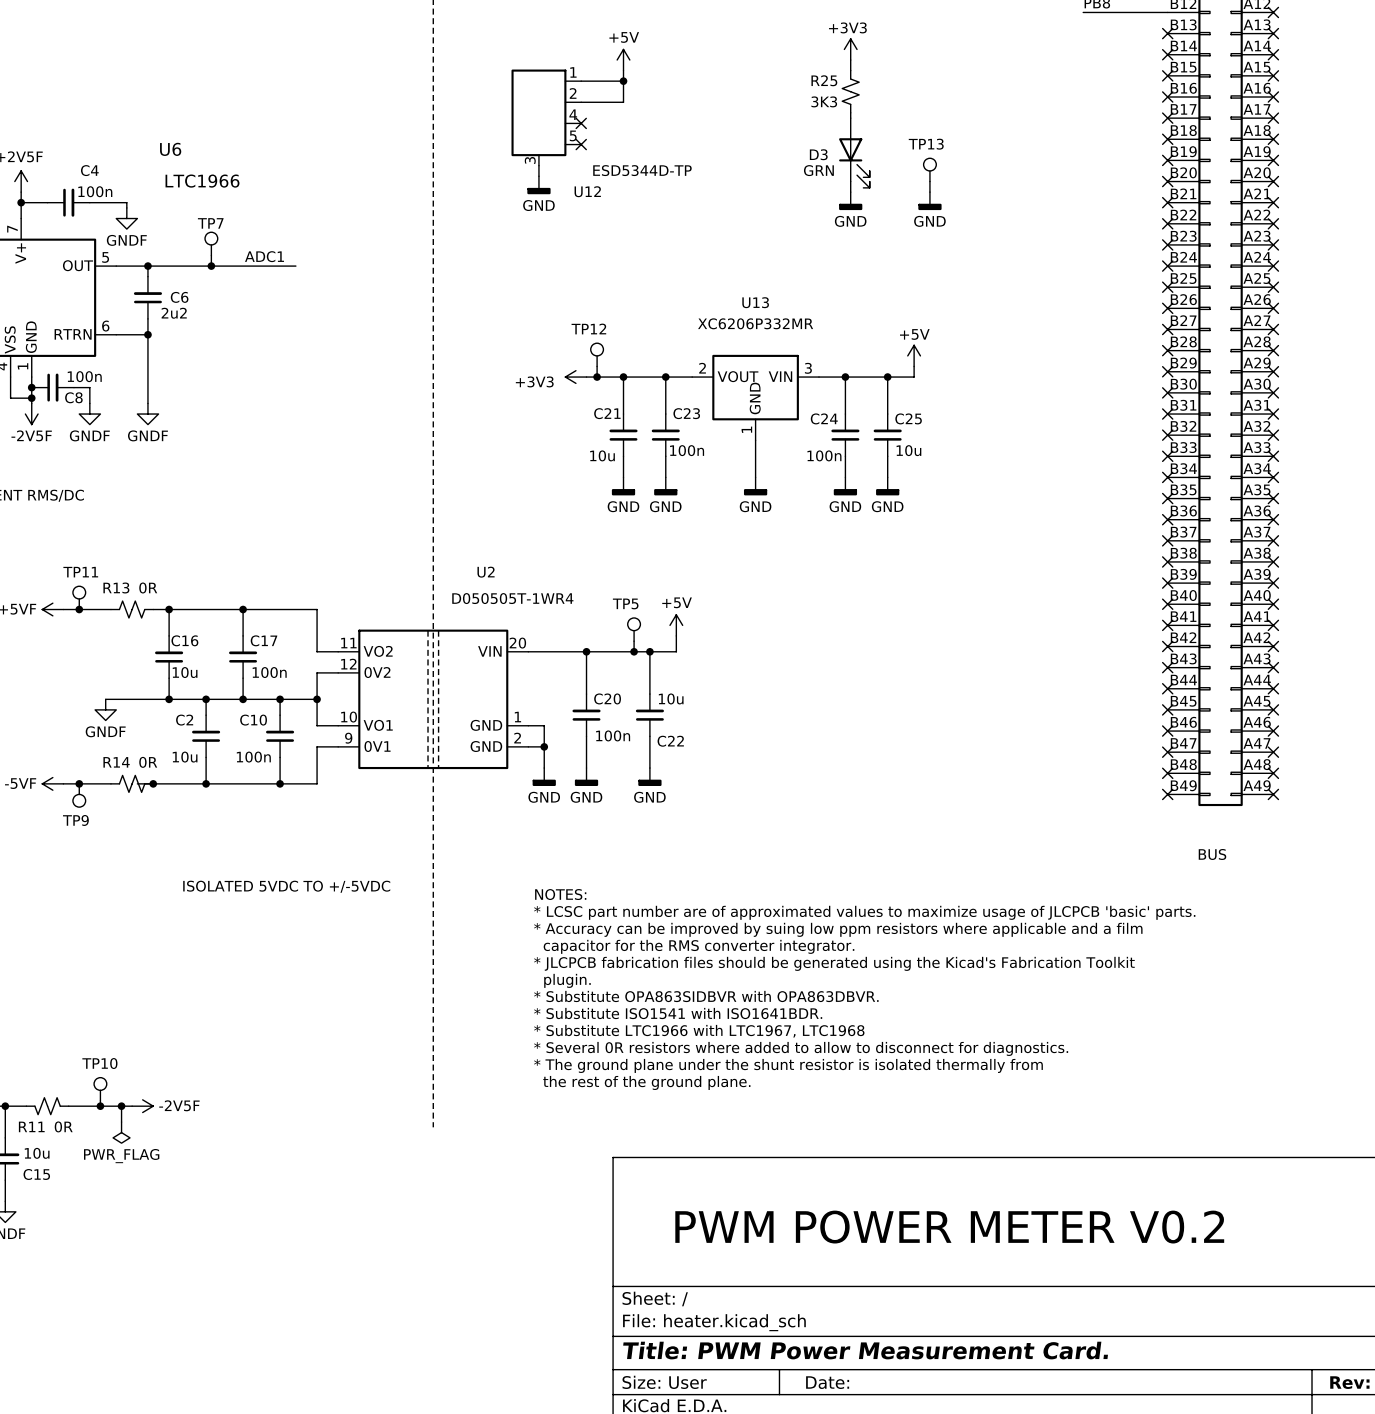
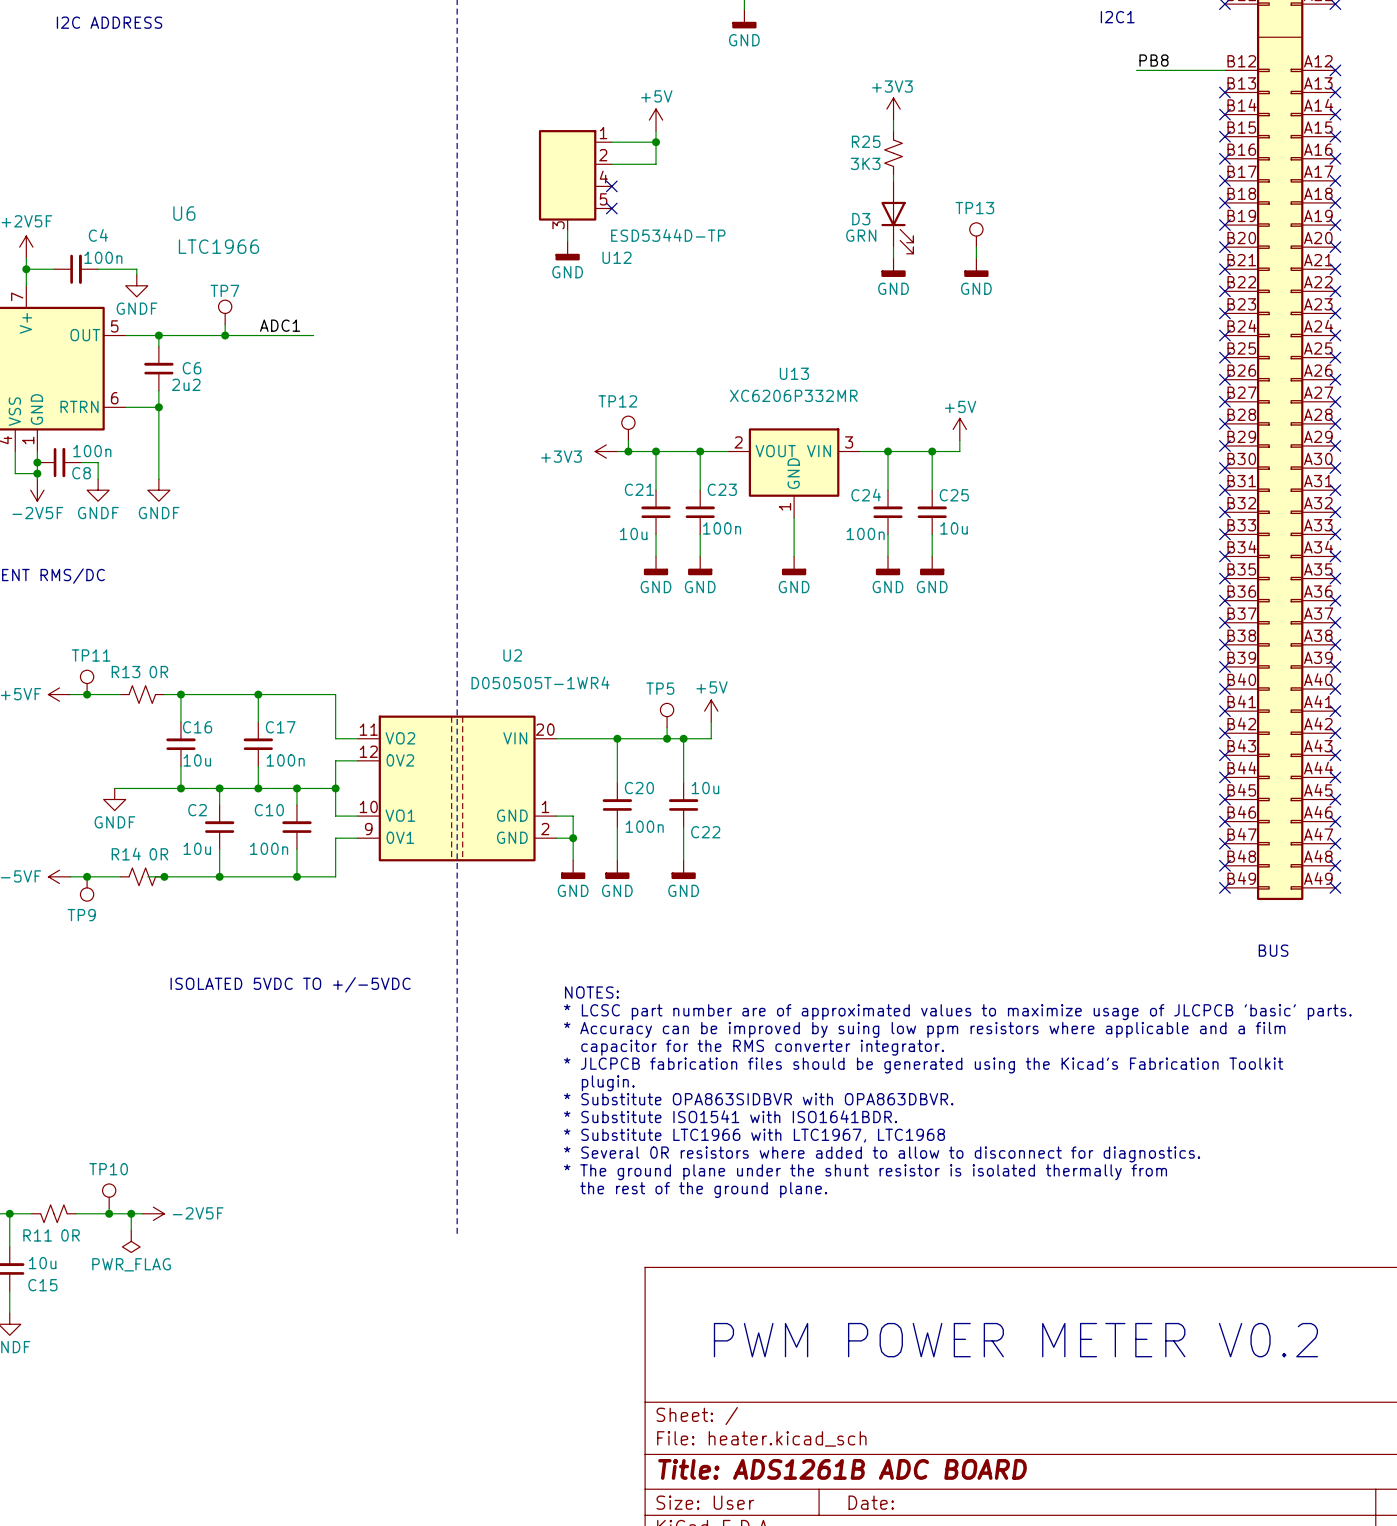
title block: Title: PWM Power Measurement Card. (865, 1350) -> Title: ADS1261B ADC BOARD (842, 1469)

